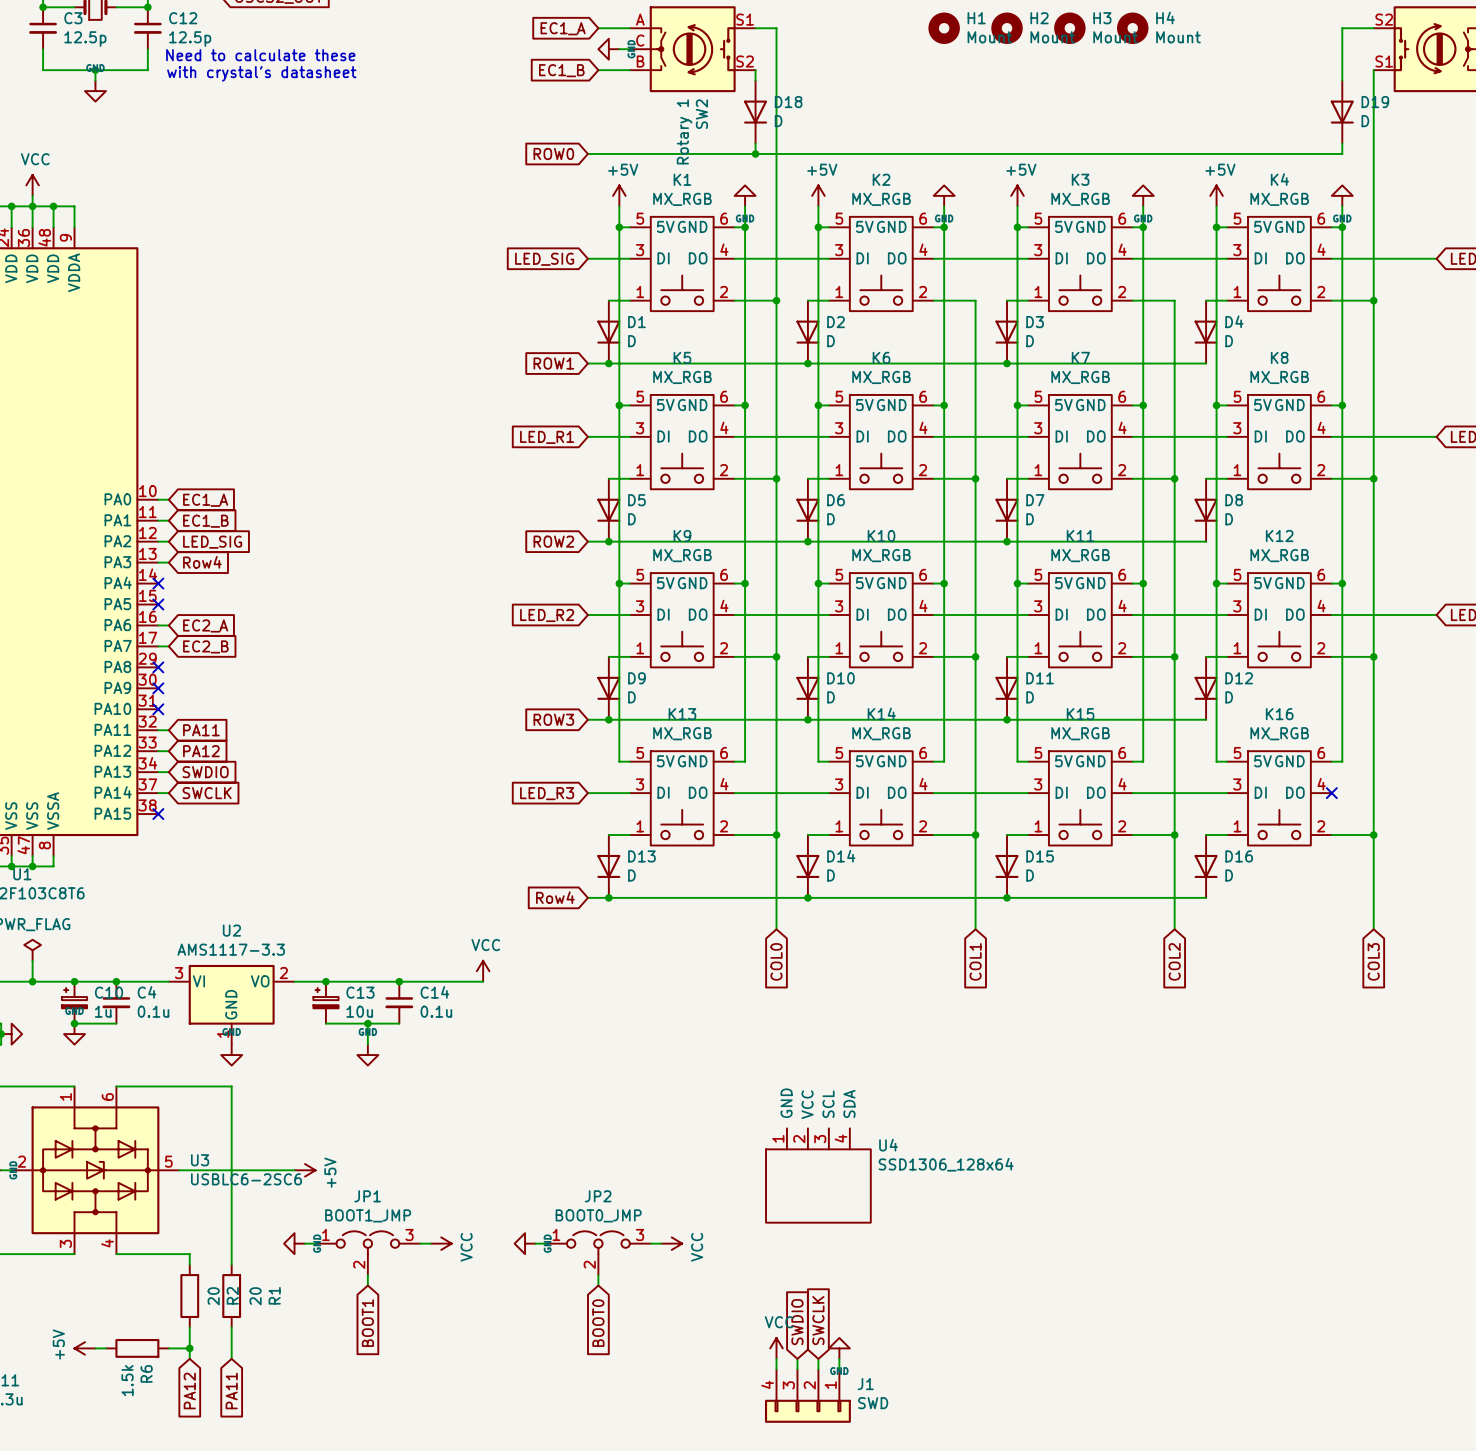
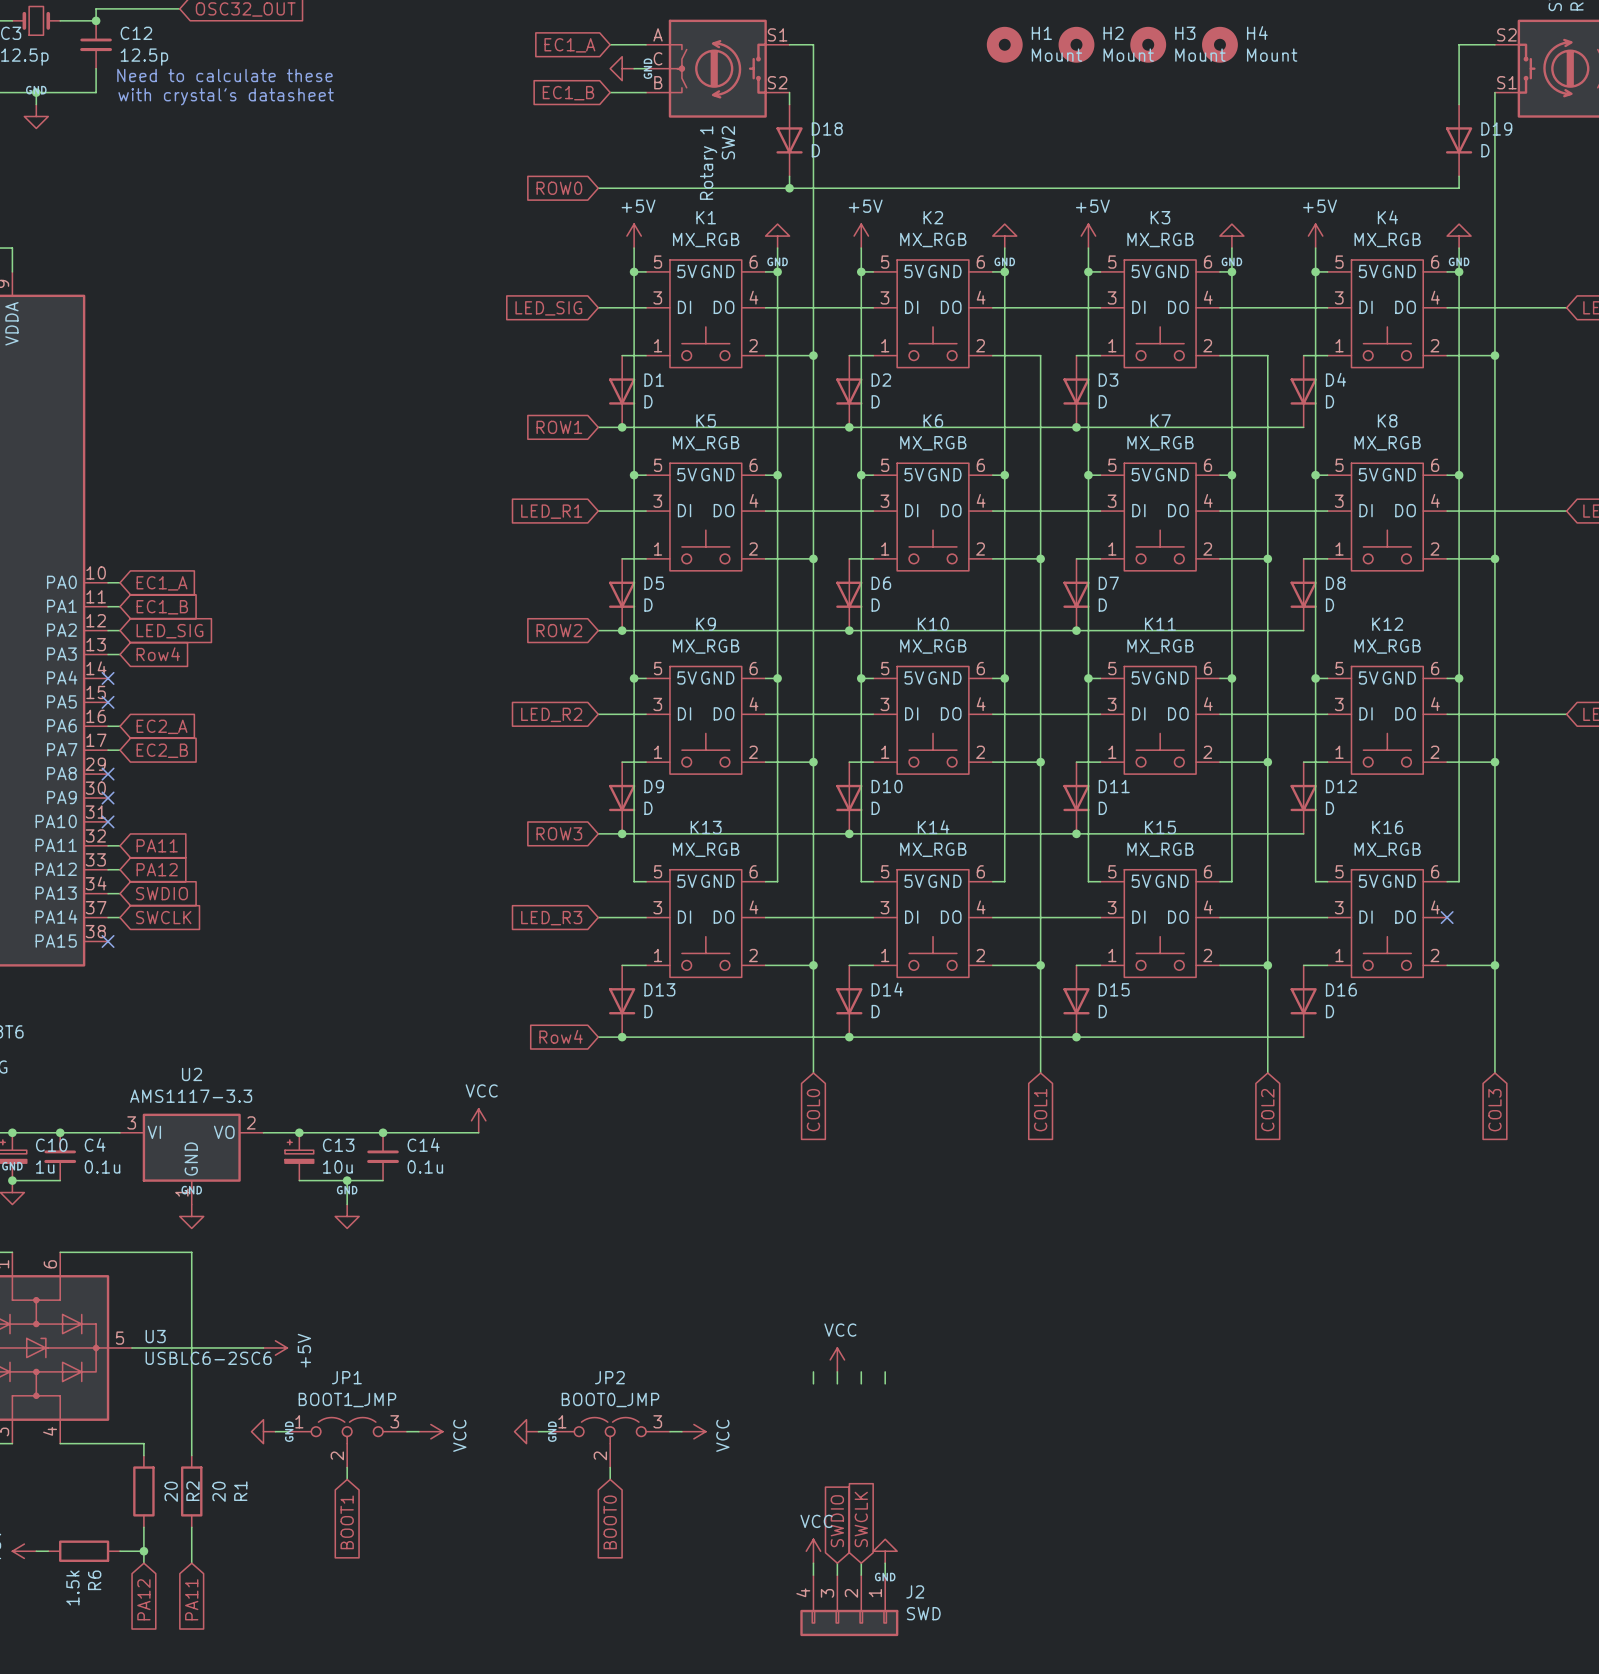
U4: SSD1306_128x64 (818, 1175) -> none
power symbol: none -> VCC (837, 1359)
wire: none -> (813, 1371) (813, 1383)
wire: none -> (837, 1371) (837, 1383)
wire: none -> (861, 1371) (861, 1383)
wire: none -> (885, 1371) (885, 1383)
J1 name: J1 (865, 1384) -> J2 (915, 1591)

